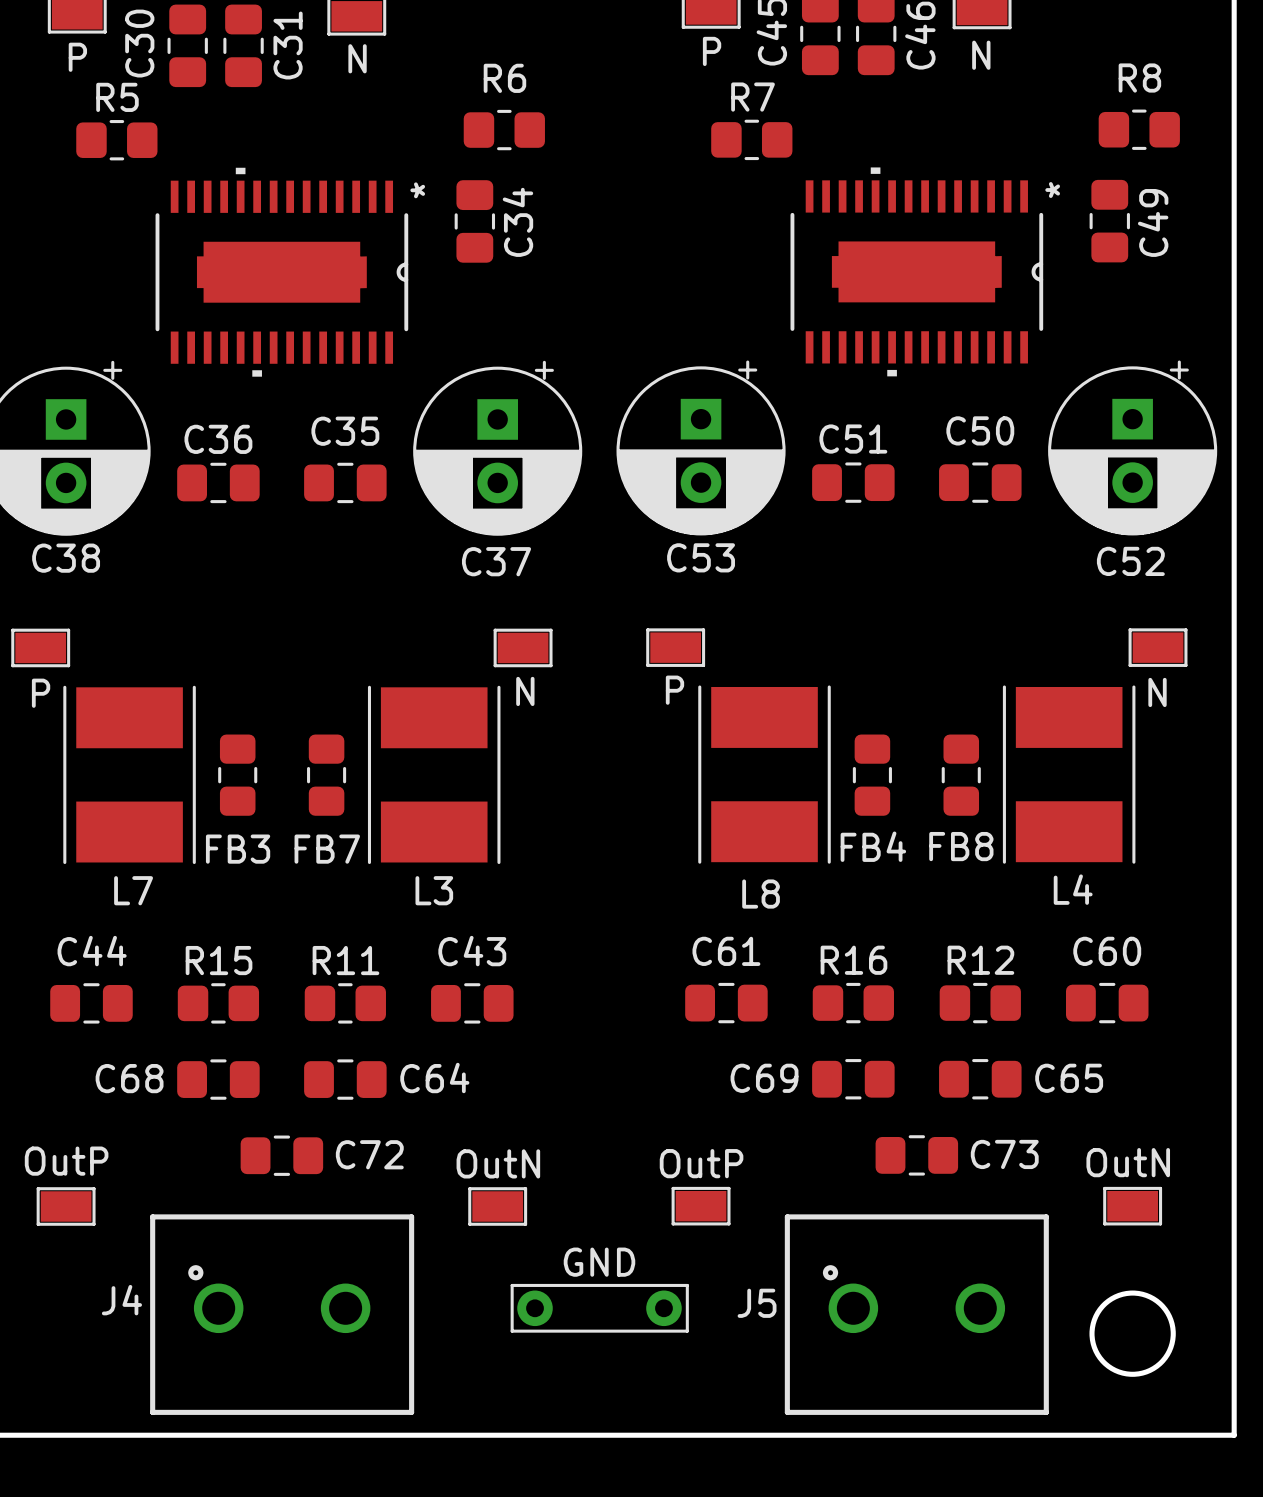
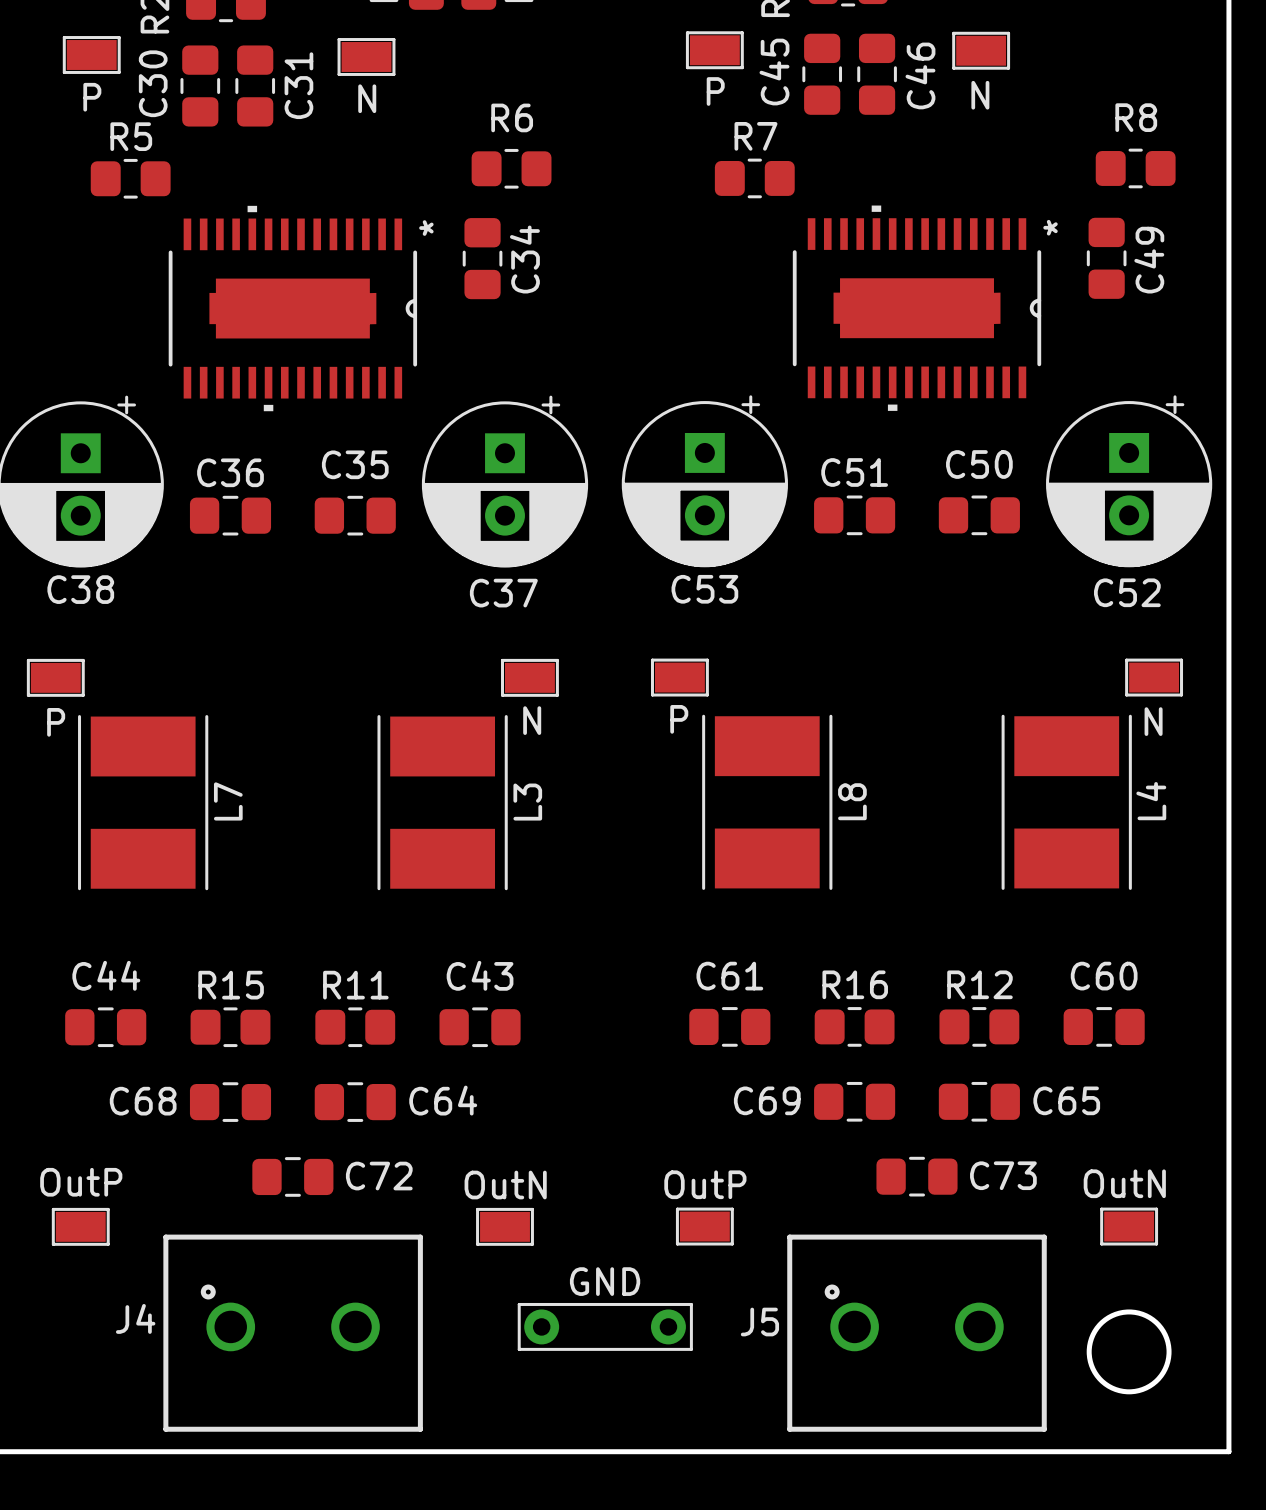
FB3: (237, 775) -> none
FB7: (326, 775) -> none
FB4: (872, 775) -> none
FB8: (961, 775) -> none
L4 name rotation: 0° (1073, 889) -> 90° counterclockwise (1151, 801)
L4 name position: L4 (1073, 889) -> L4 (1151, 801)
L7 name rotation: 0° (133, 890) -> 90° counterclockwise (228, 801)
L7 name position: L7 (133, 890) -> L7 (228, 801)
L3 name rotation: 0° (434, 890) -> 90° counterclockwise (527, 802)
L3 name position: L3 (434, 890) -> L3 (527, 802)
L8 name rotation: 0° (761, 894) -> 90° counterclockwise (852, 801)
L8 name position: L8 (761, 894) -> L8 (852, 801)

